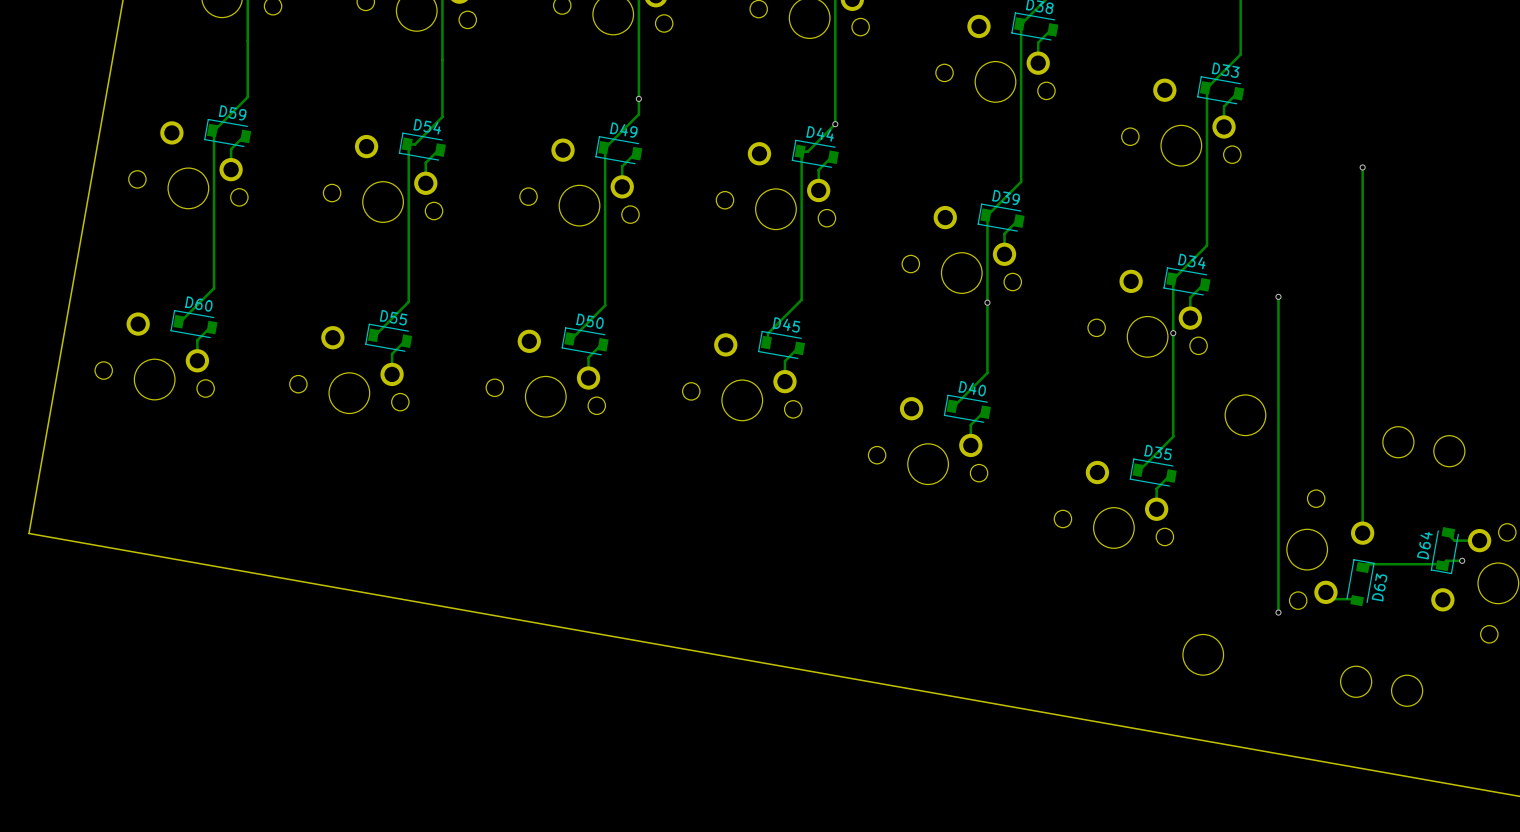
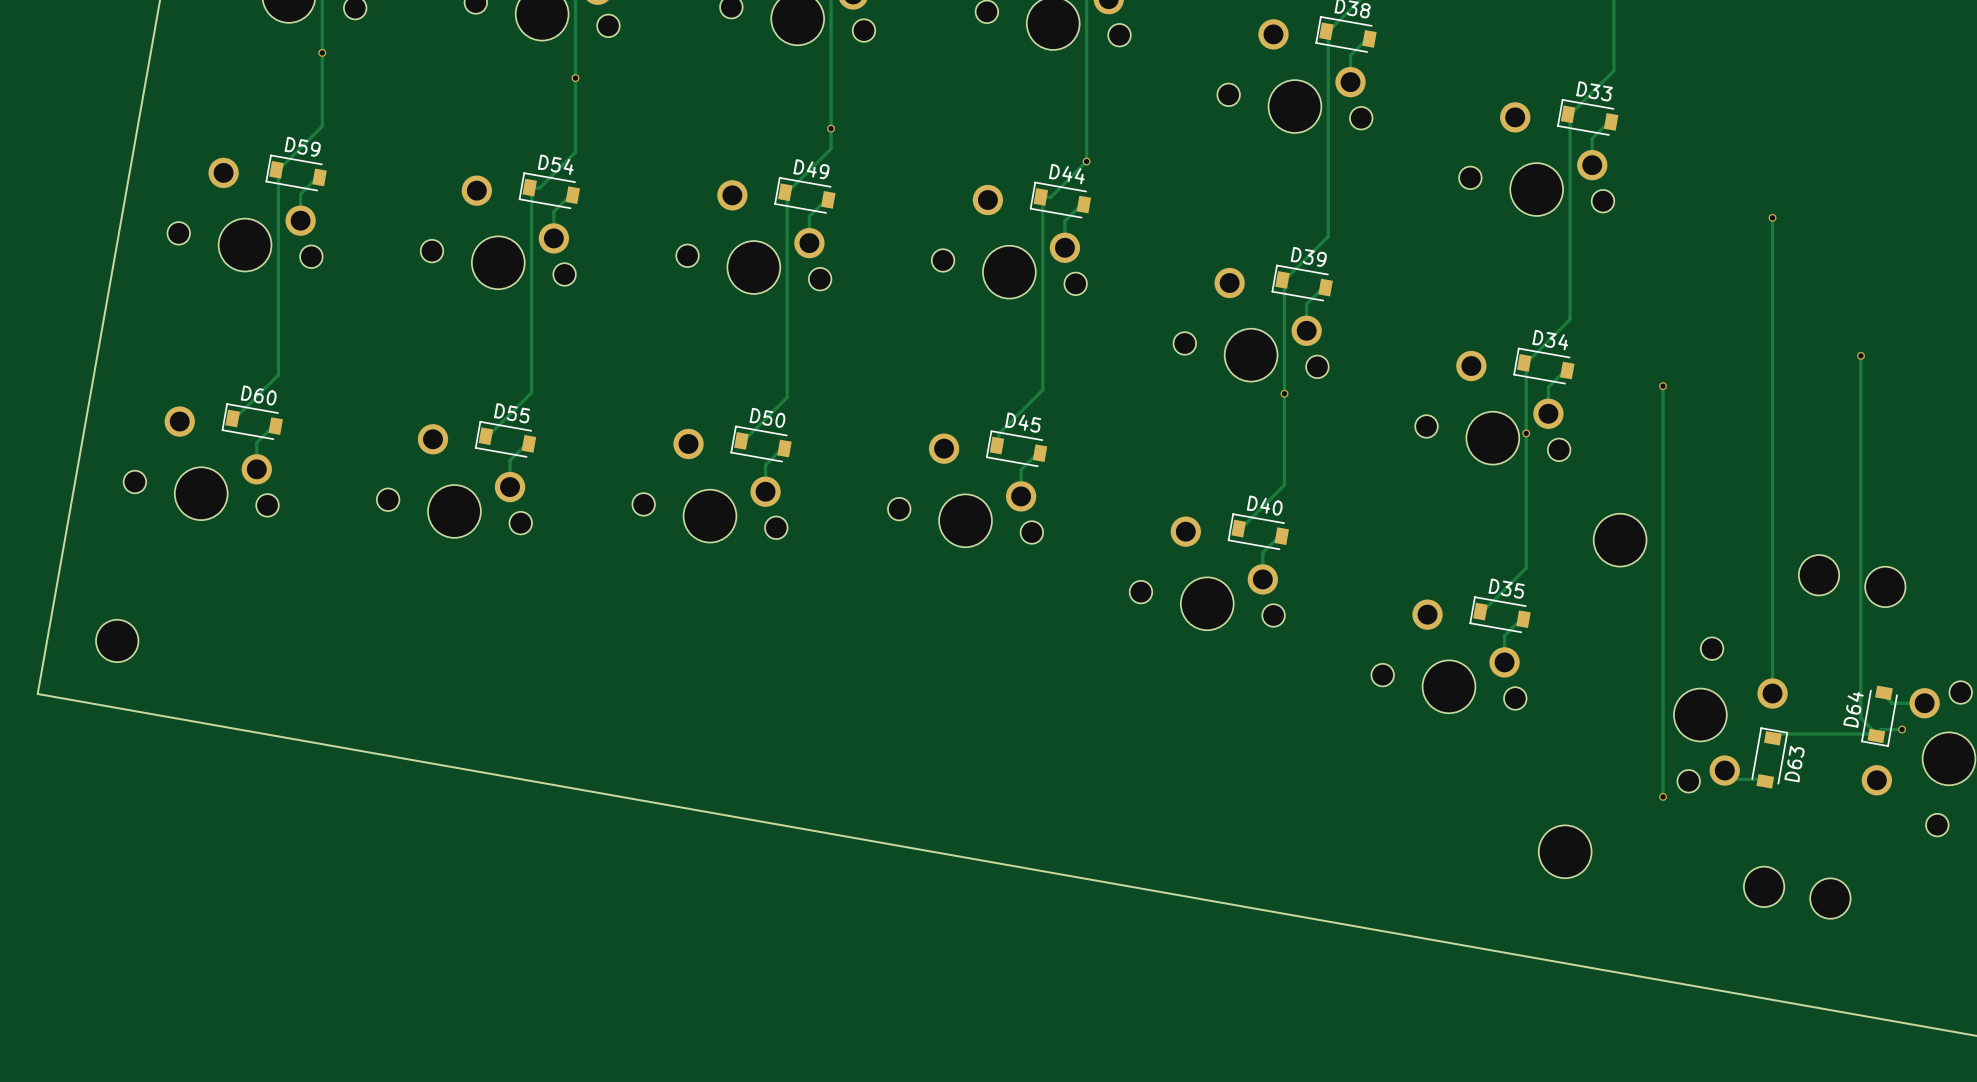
via: none -> (322, 52)
via: none -> (575, 78)
track: none -> (1860, 356) (1860, 718) (1876, 733)
via: none -> (1860, 355)
part: none -> (117, 640)

